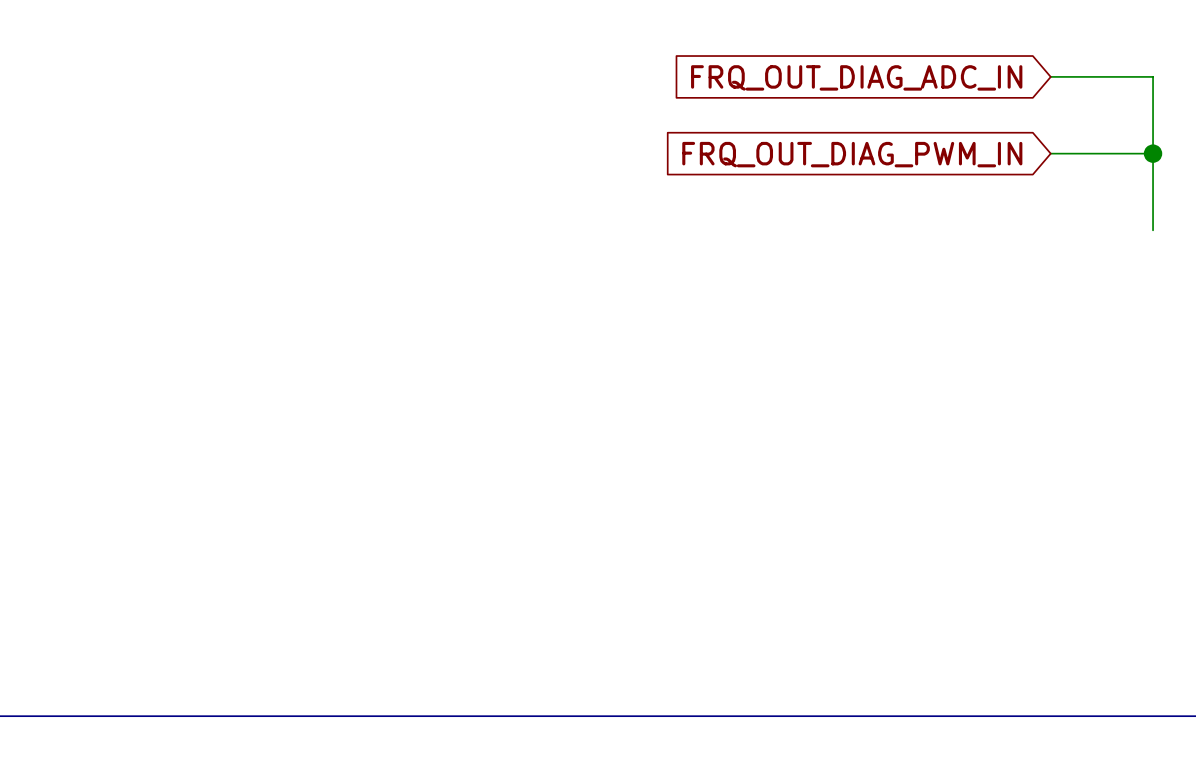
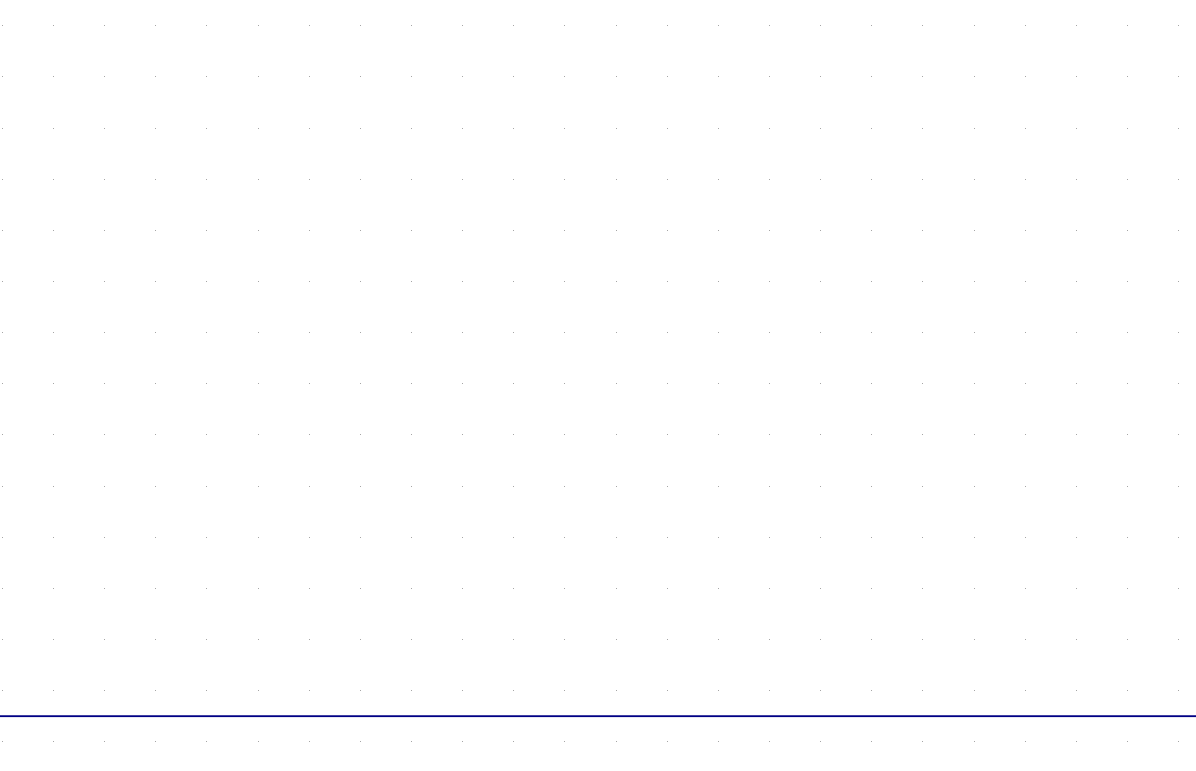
wire: (1050, 76) (1153, 76) (1153, 230) -> none
global label: FRQ_OUT_DIAG_ADC_IN (856, 77) -> none
wire: (1050, 153) (1153, 153) -> none
junction: (1153, 153) -> none
global label: FRQ_OUT_DIAG_PWM_IN (852, 154) -> none

